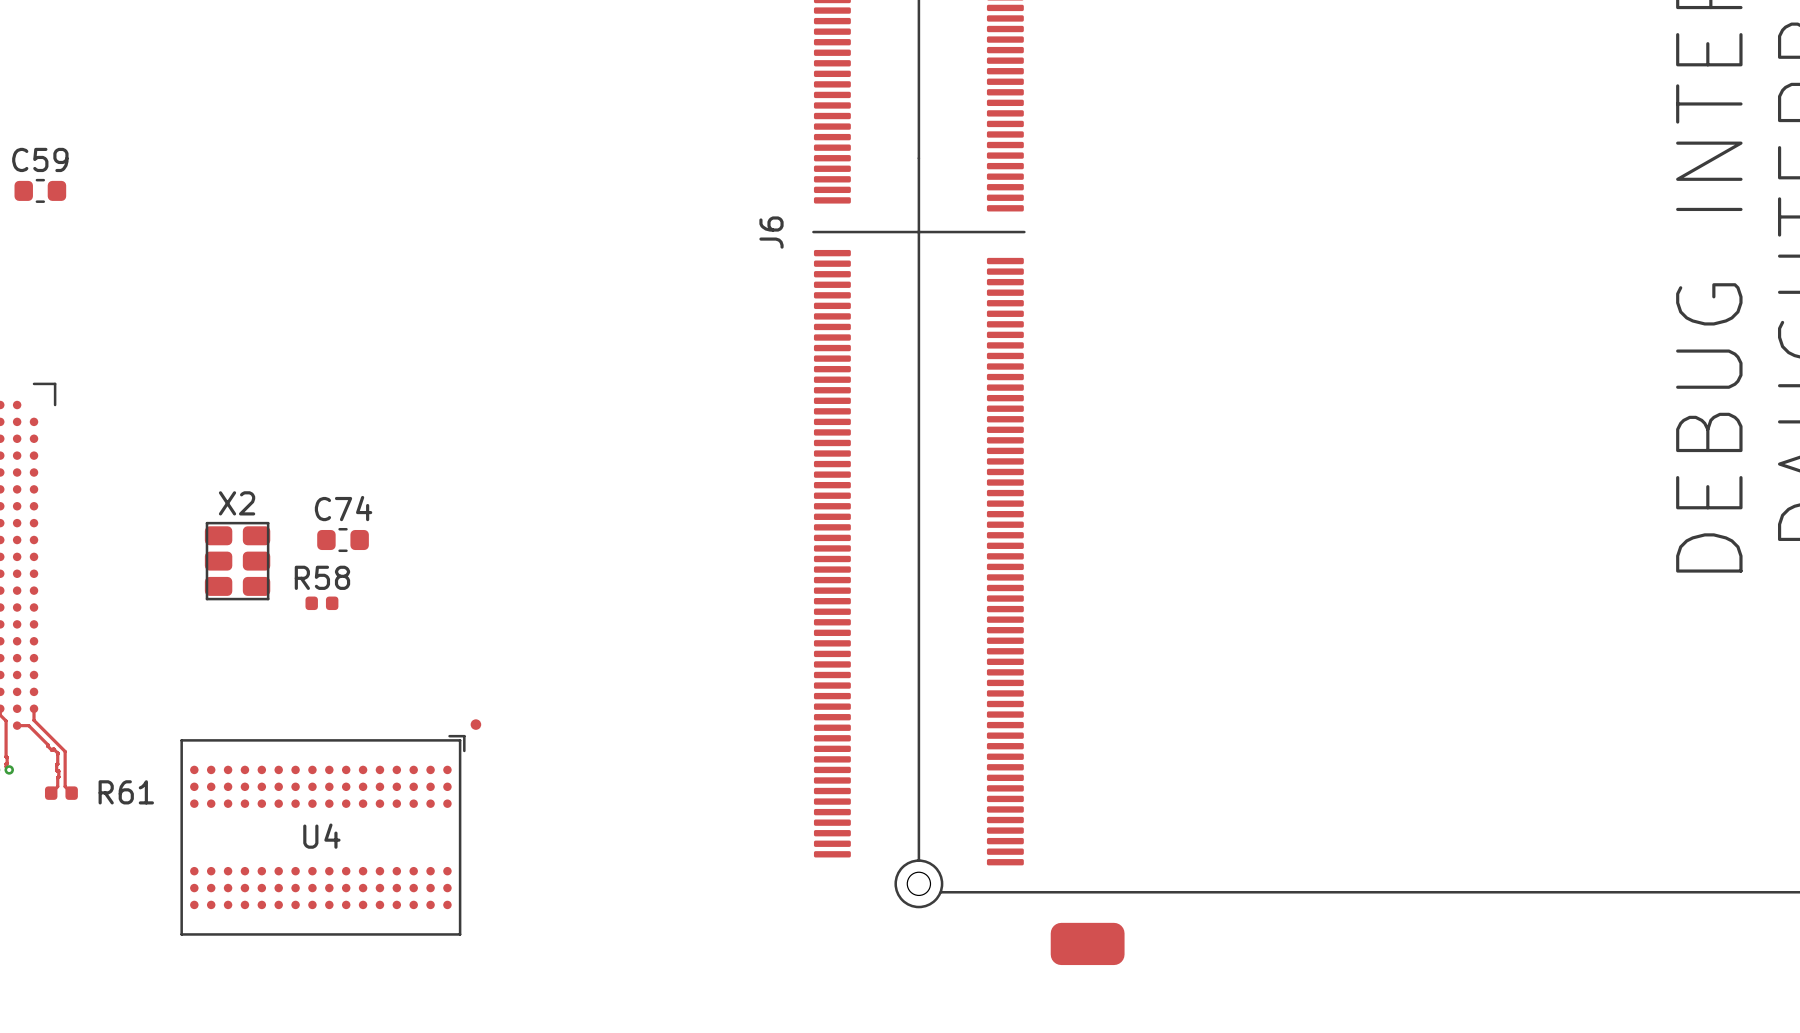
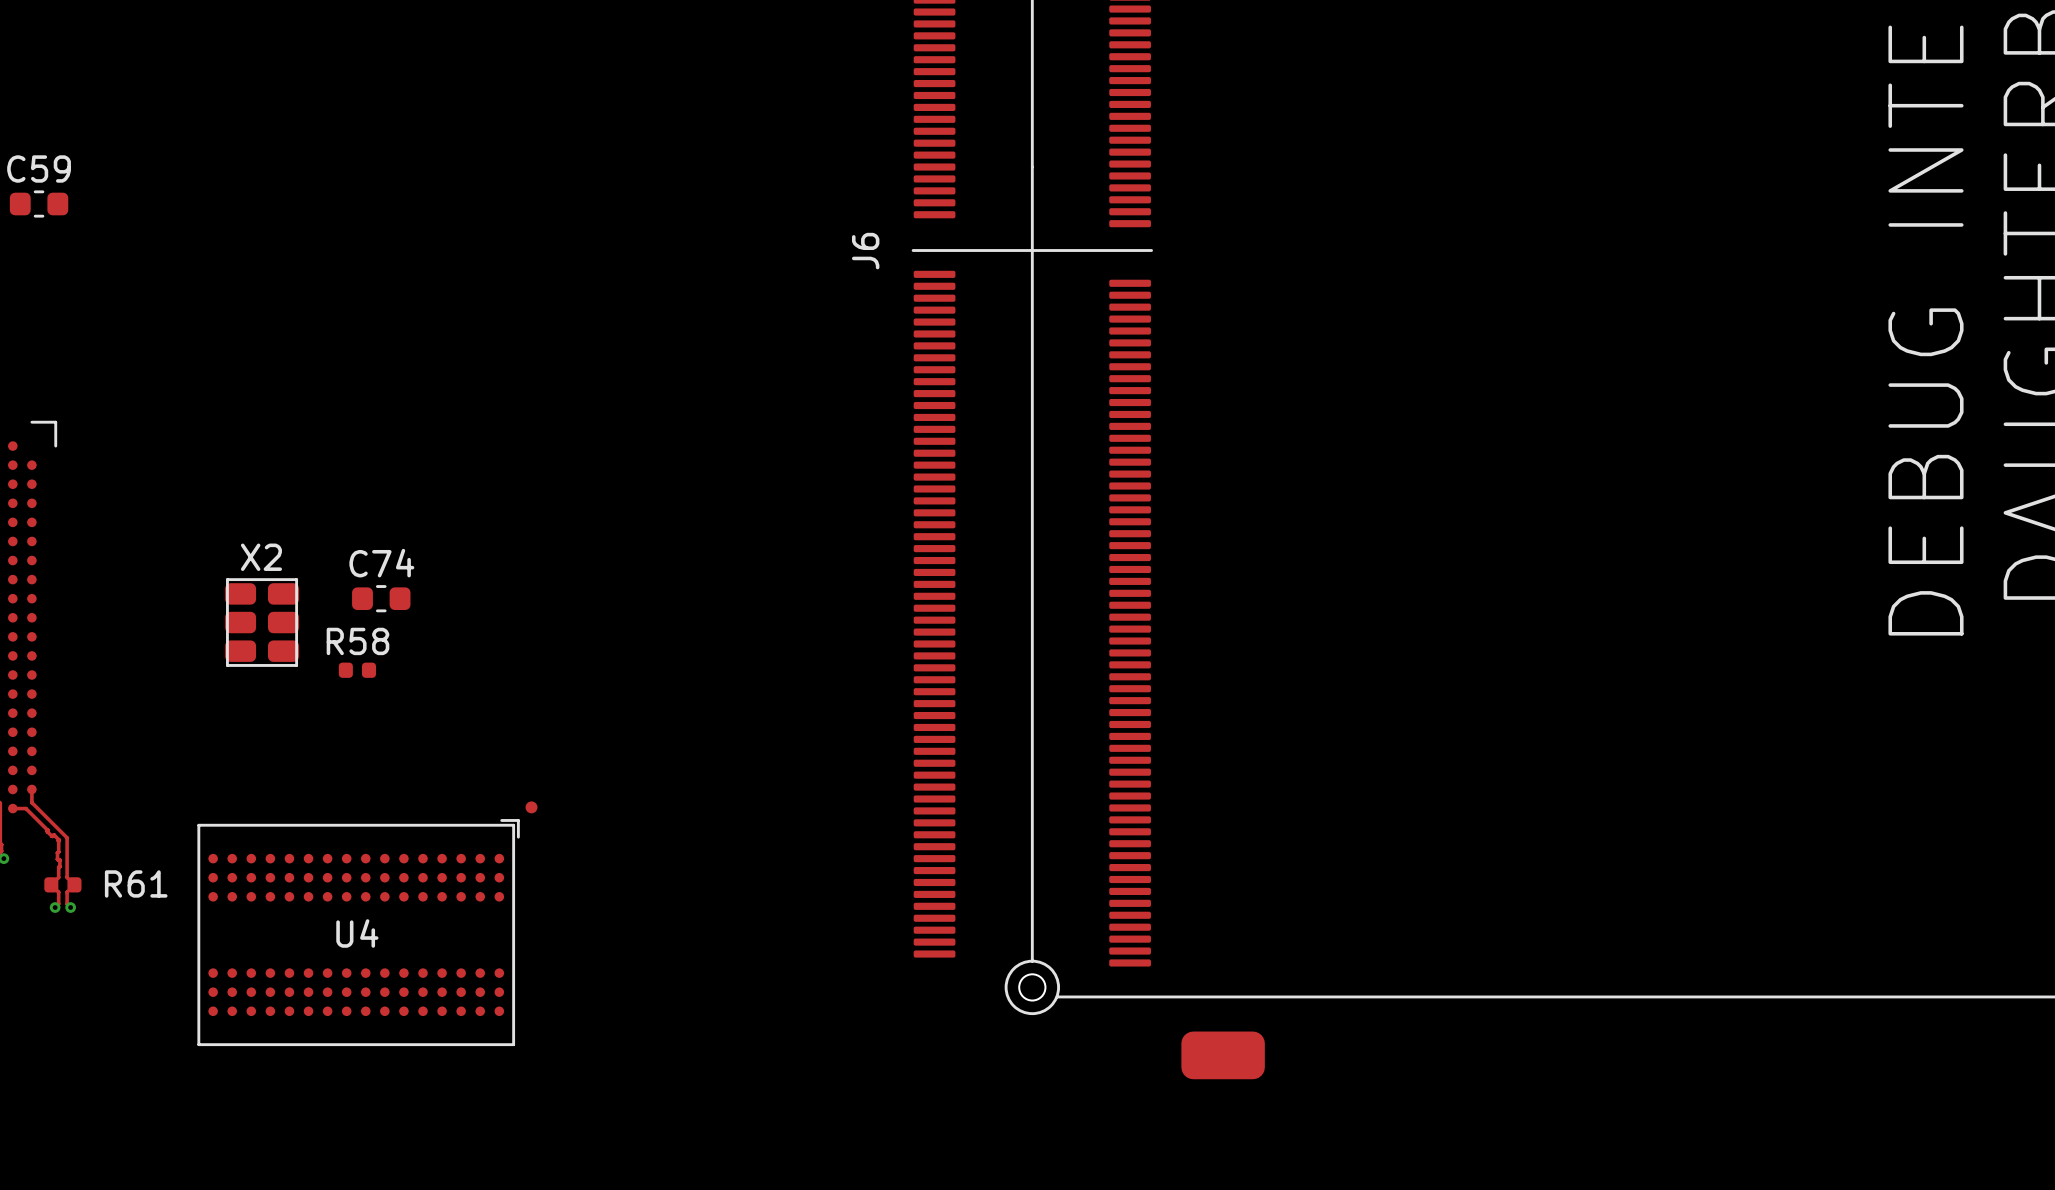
track: none -> (51, 884) (58, 892) (58, 903) (55, 907)
track: none -> (74, 884) (67, 892) (67, 903) (70, 907)
via: none -> (55, 907)
via: none -> (70, 907)

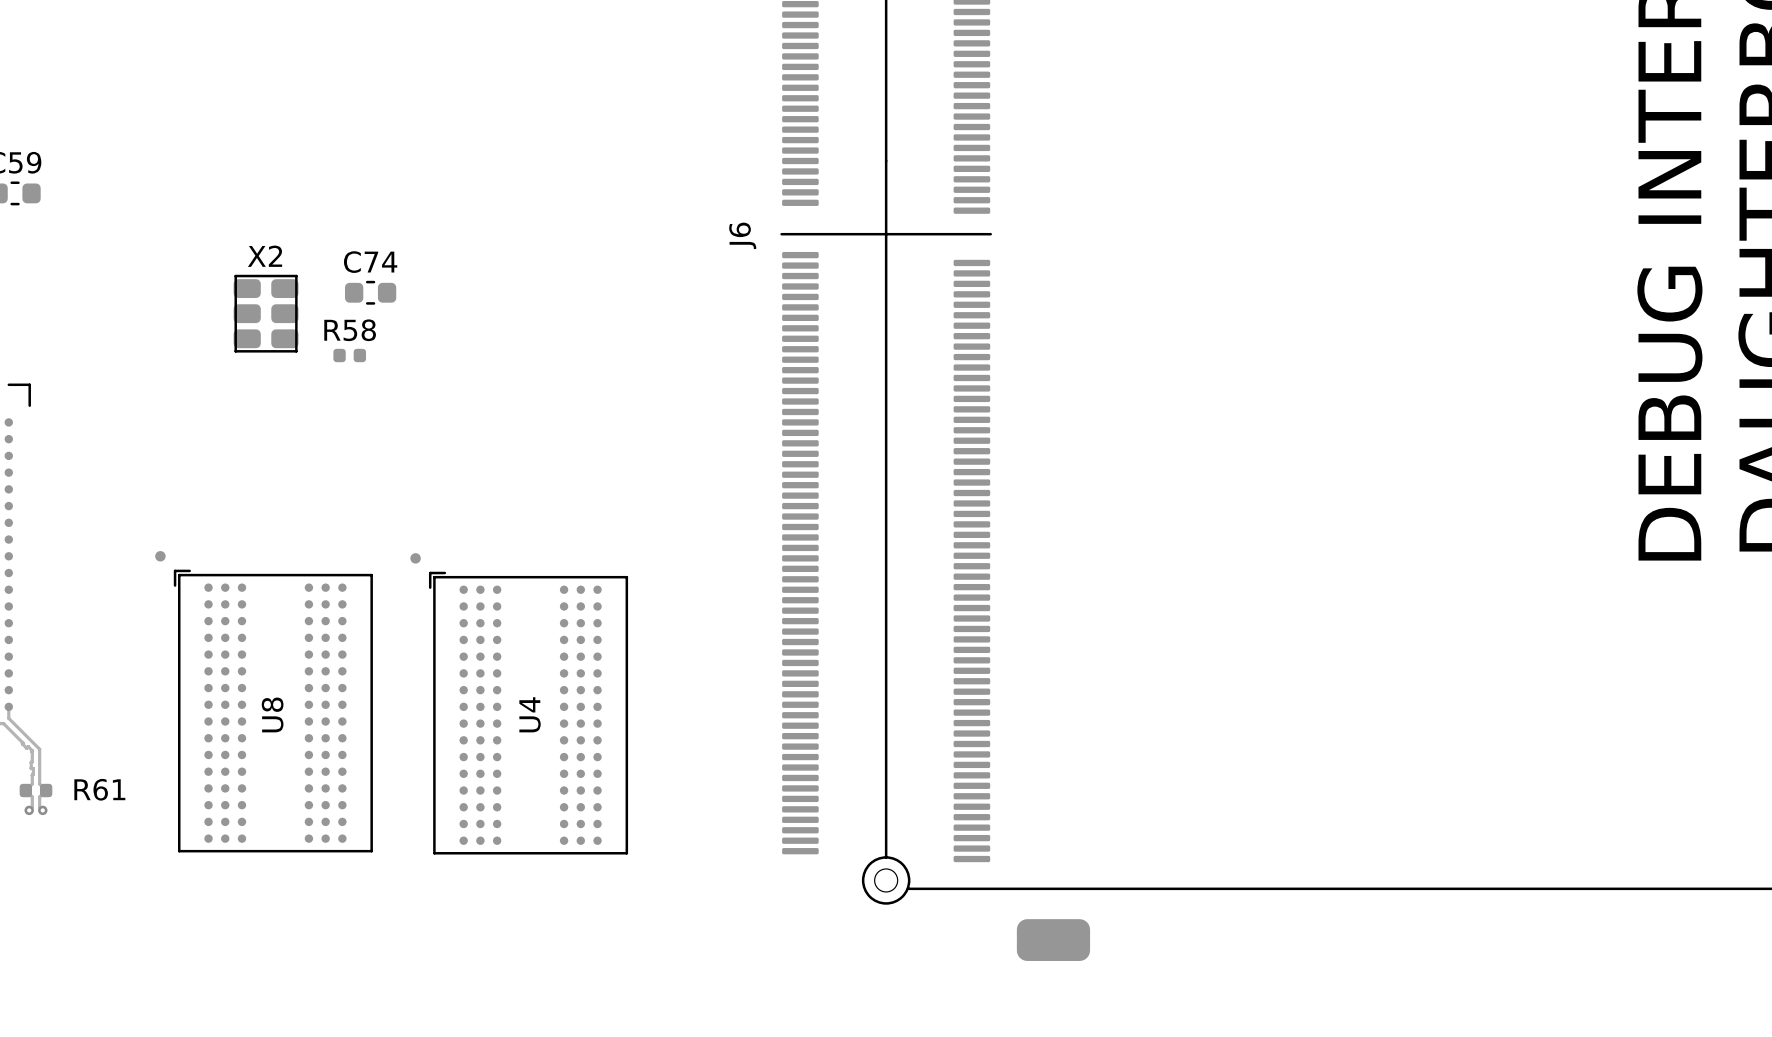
C74 position: (381, 598) -> (370, 292)
part: none -> (160, 556)
part: none -> (415, 558)
X2 position: (262, 622) -> (266, 313)
R58 position: (357, 670) -> (349, 355)
U8: none -> (273, 711)
part: (531, 807) -> none
U4 rotation: 0° (358, 932) -> 90° counterclockwise (528, 713)
U4 position: (358, 932) -> (528, 713)

